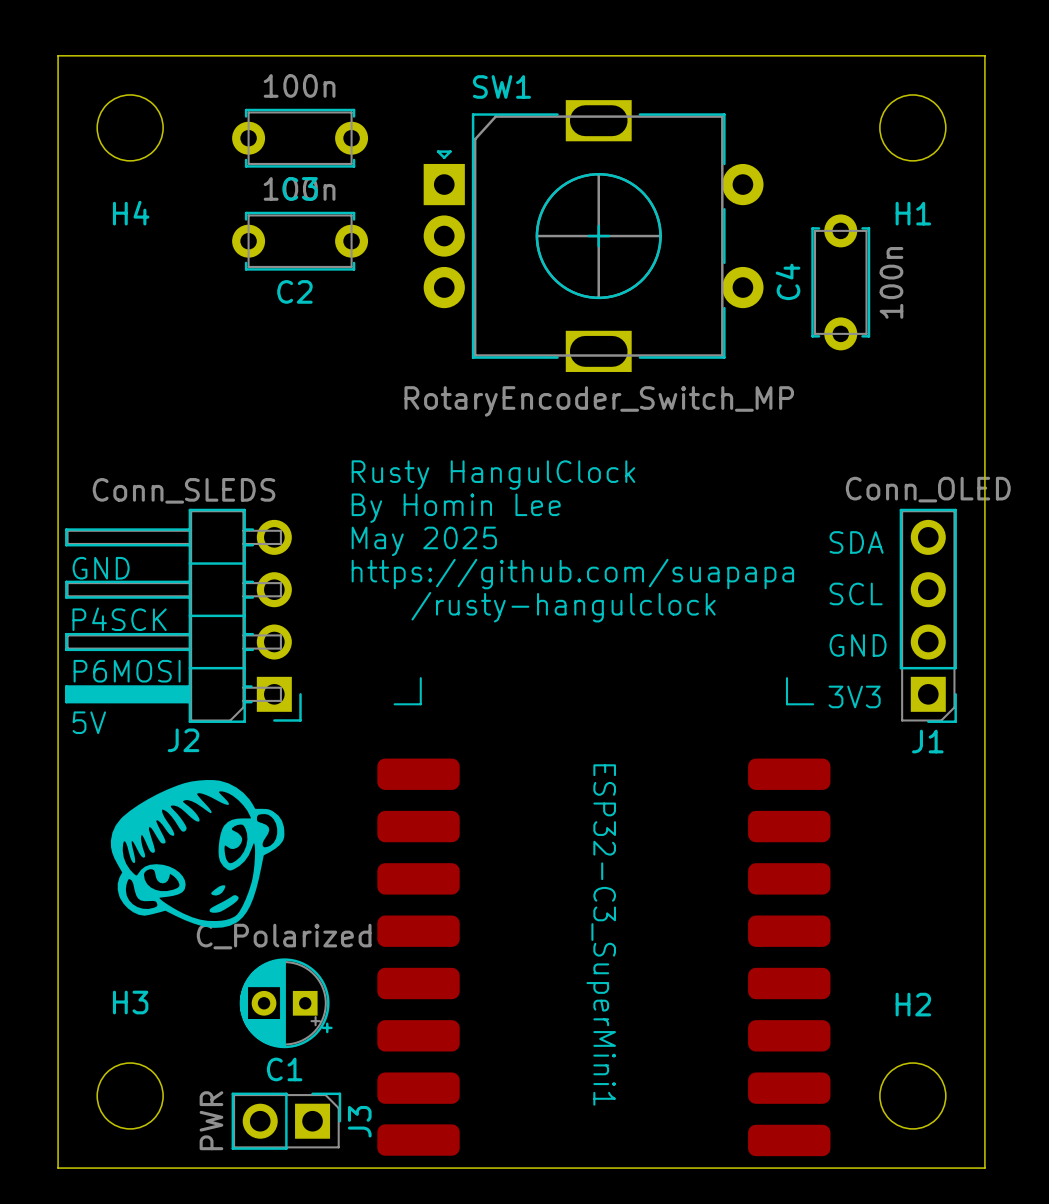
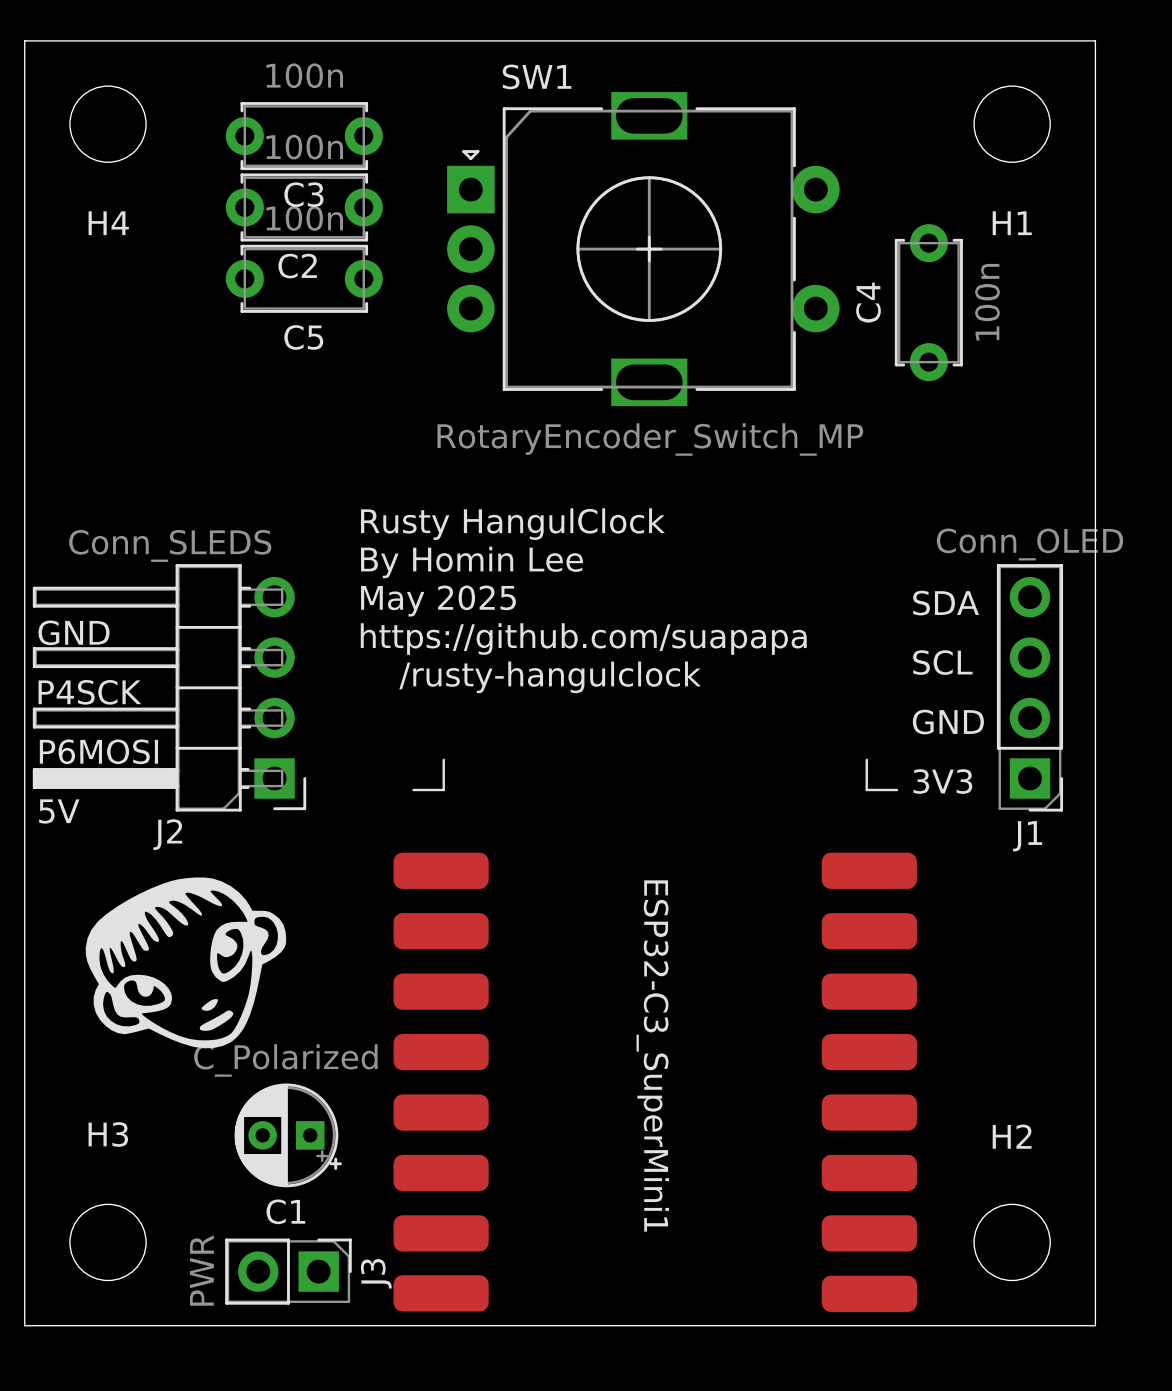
C2 position: (300, 241) -> (304, 207)
C5: none -> 100n (304, 278)

